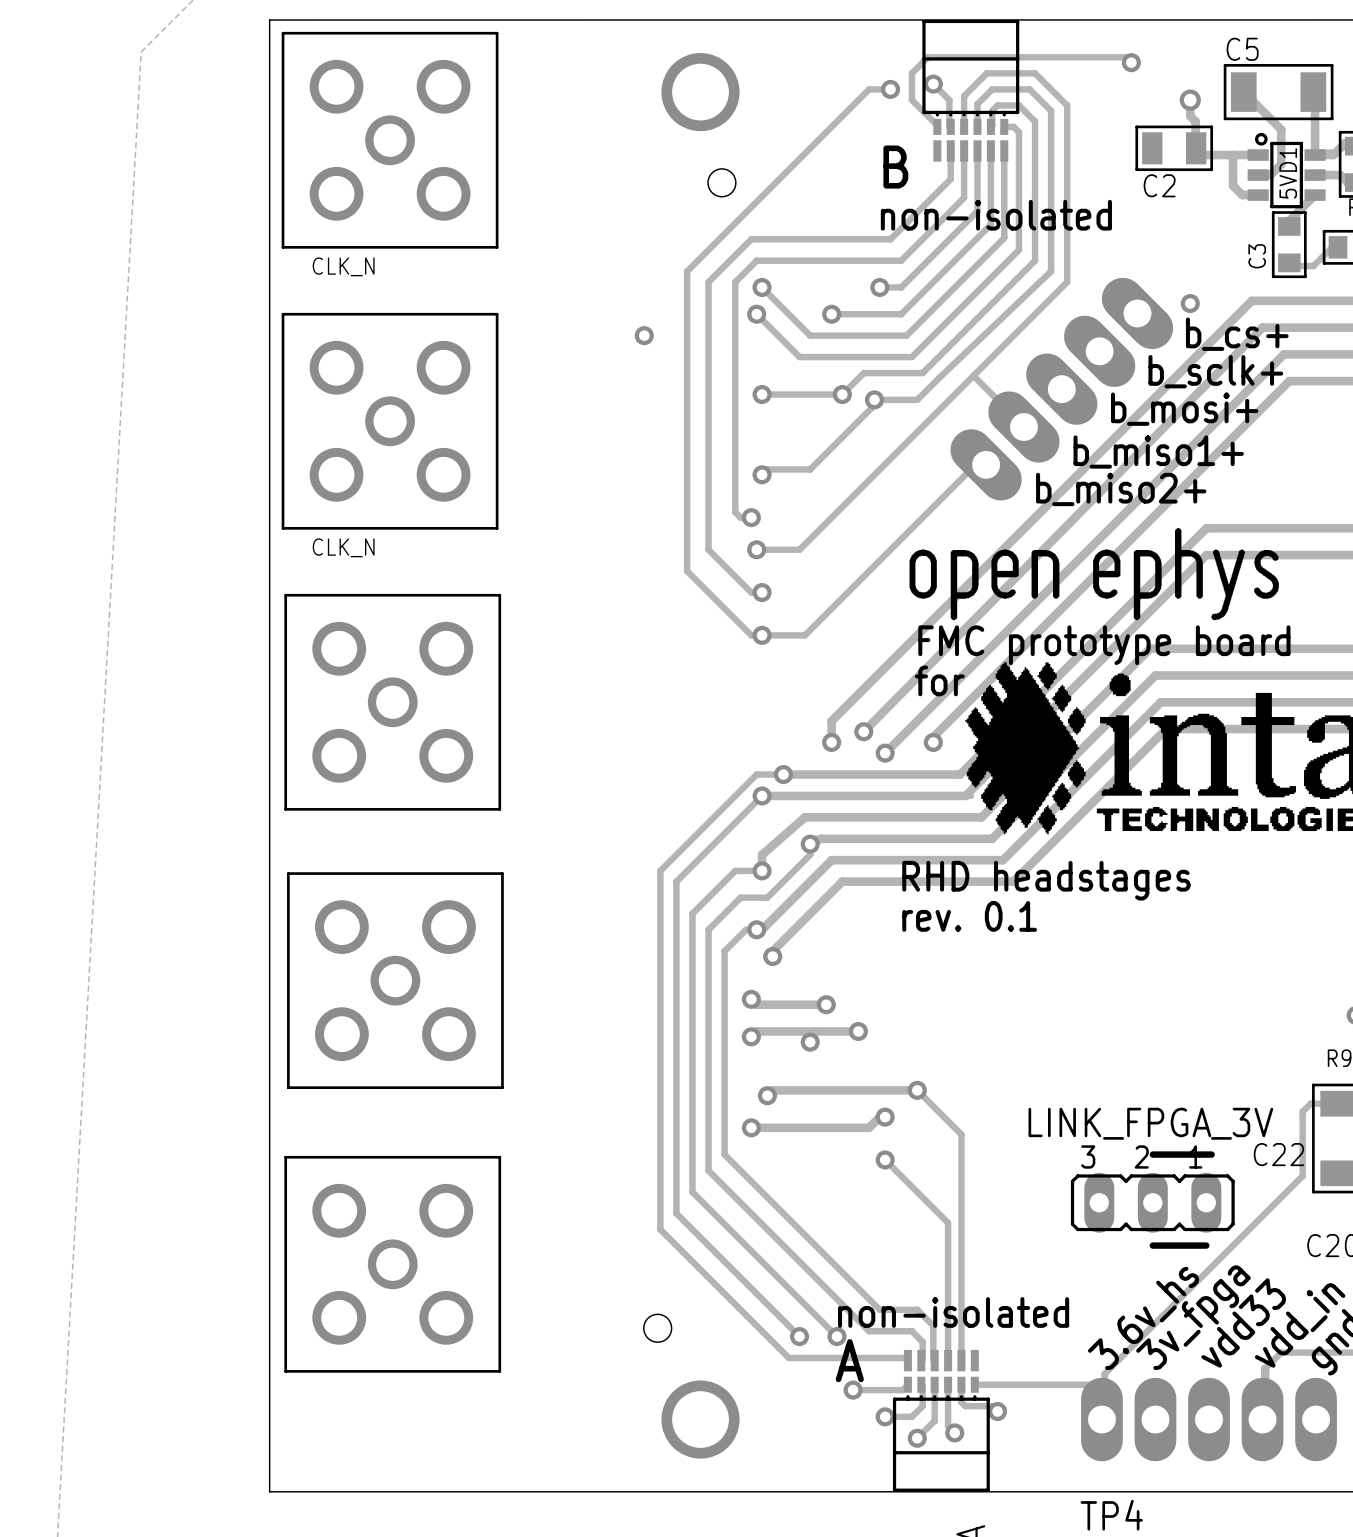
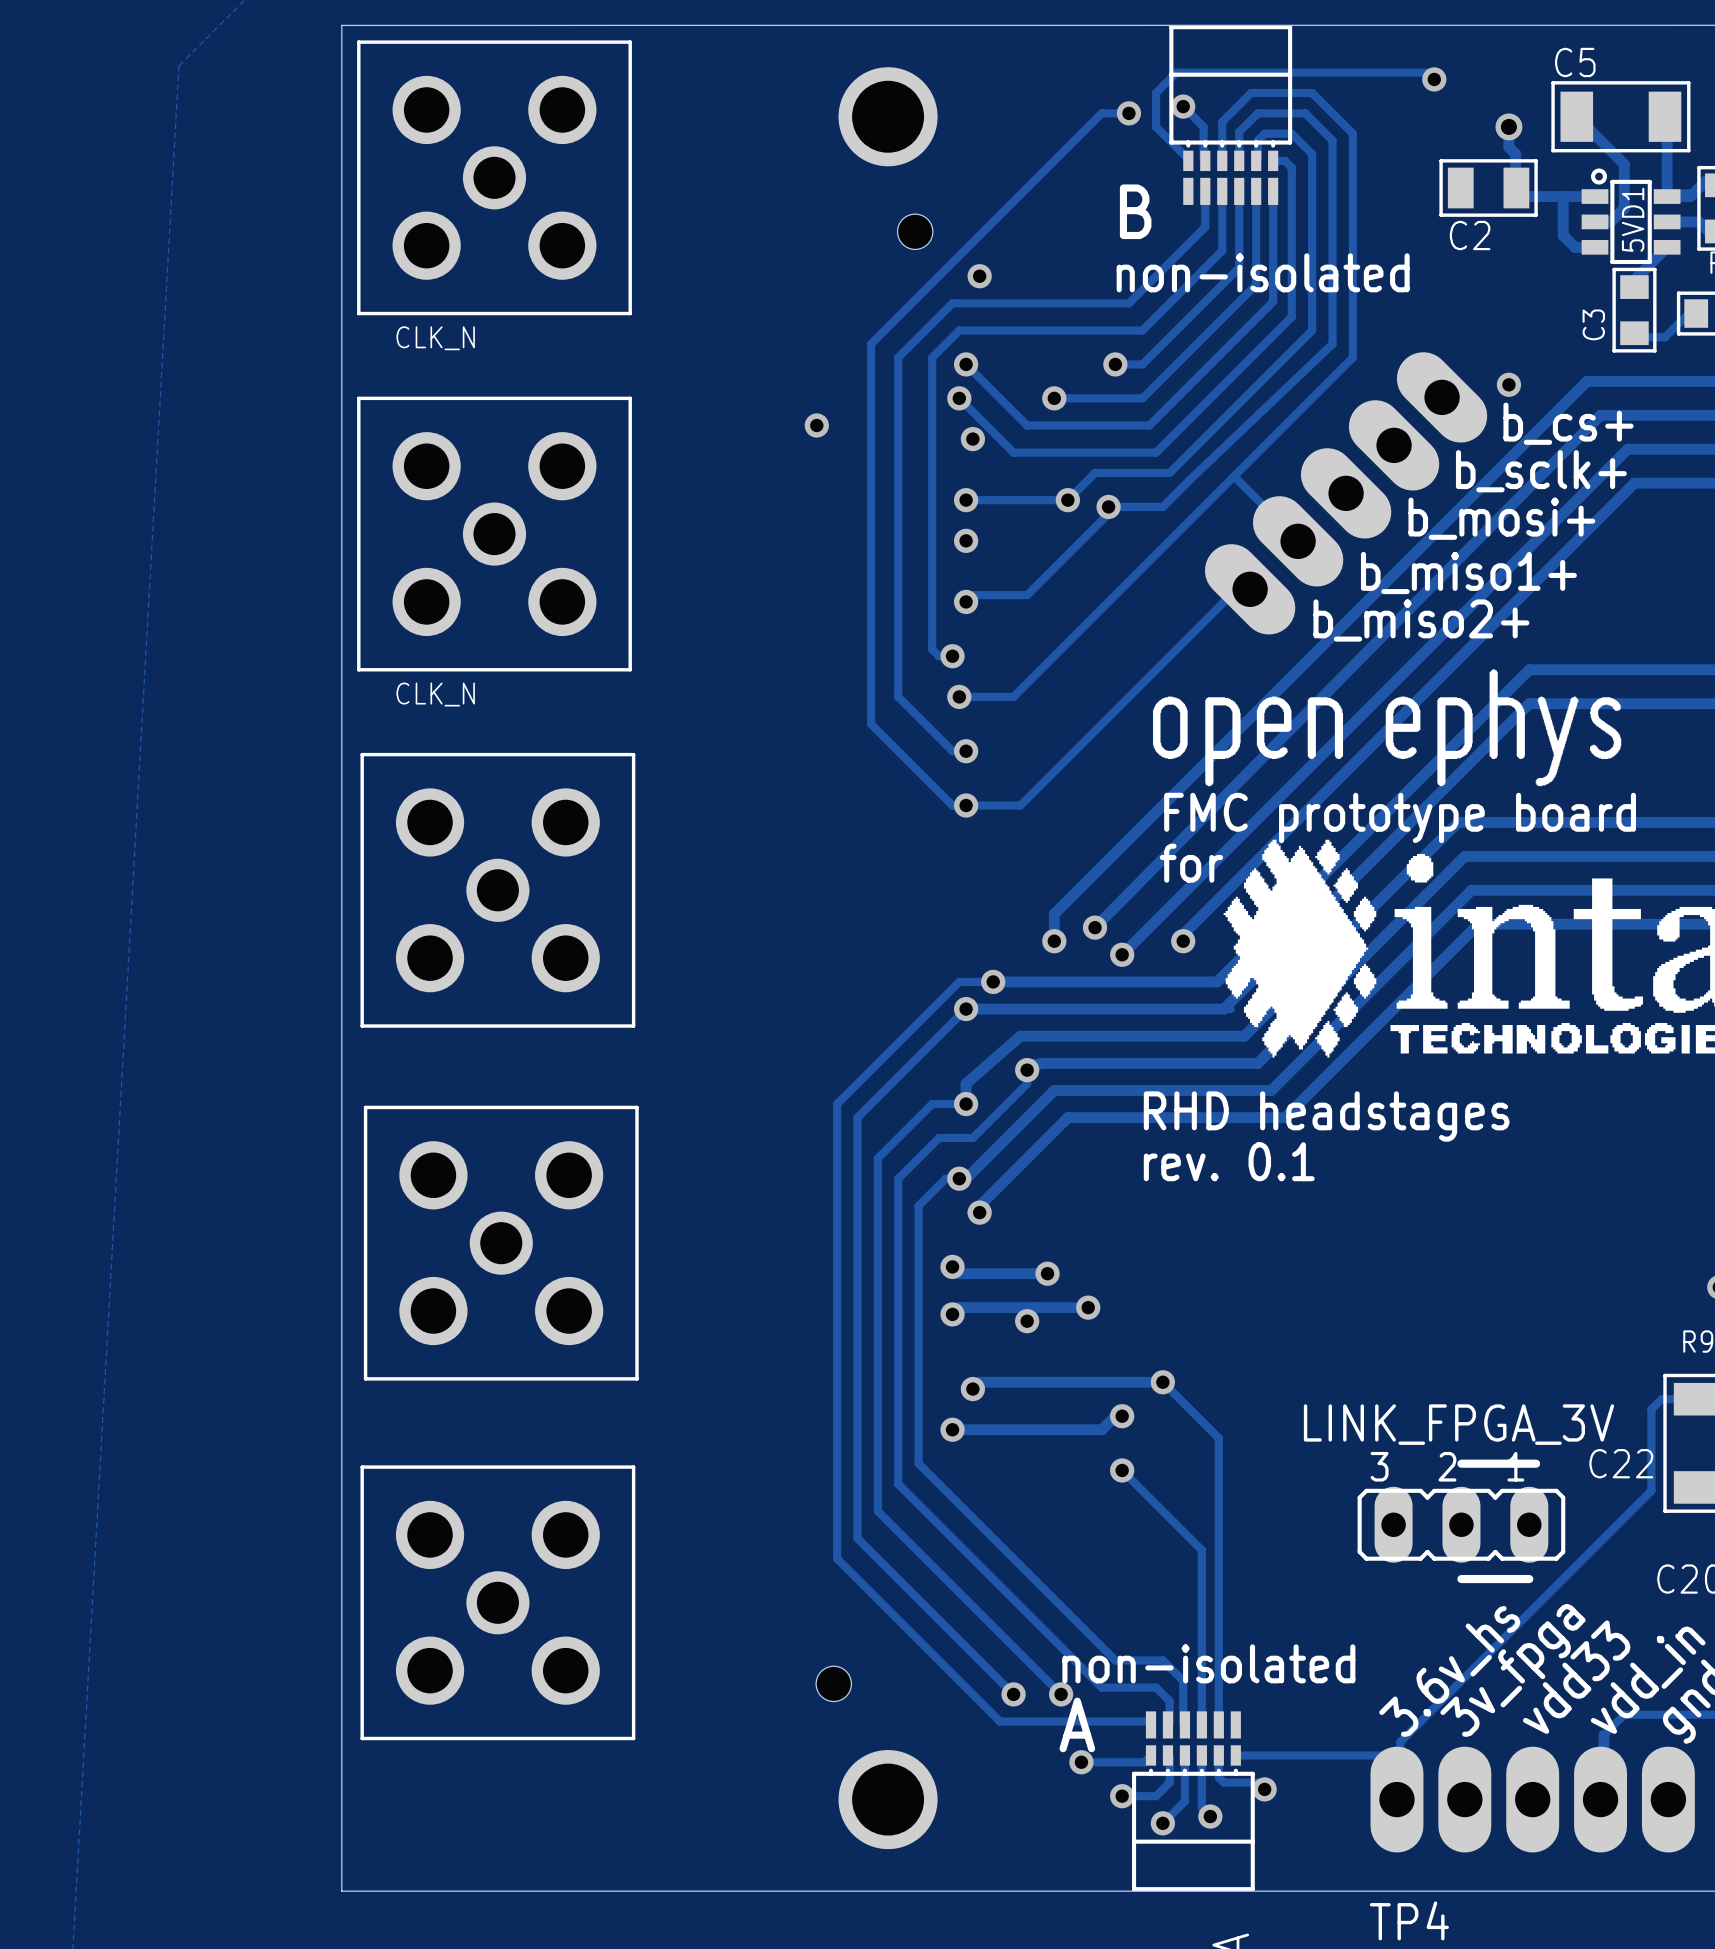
via: none -> (979, 276)
via: none -> (972, 439)
via: none -> (966, 540)

